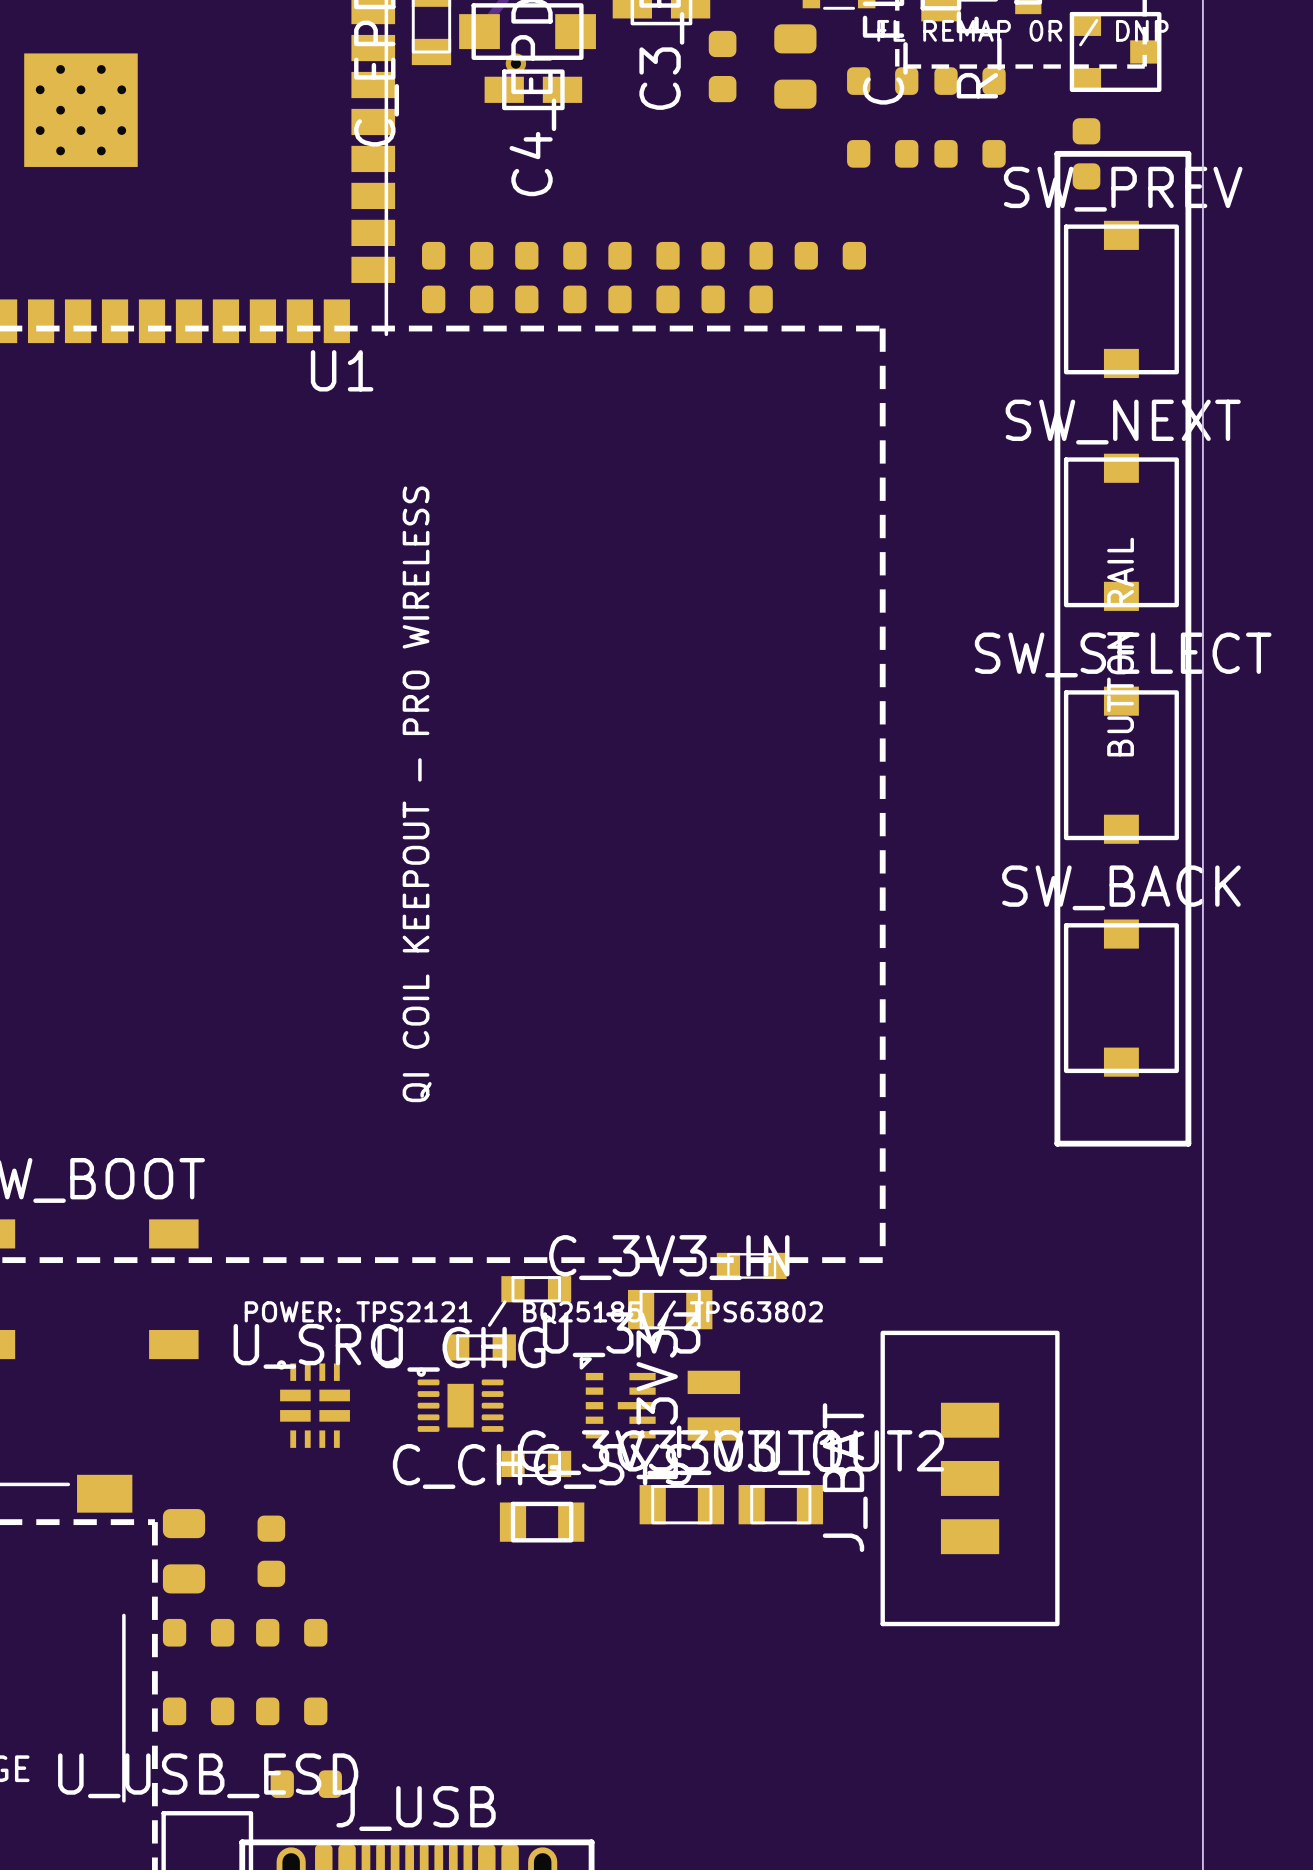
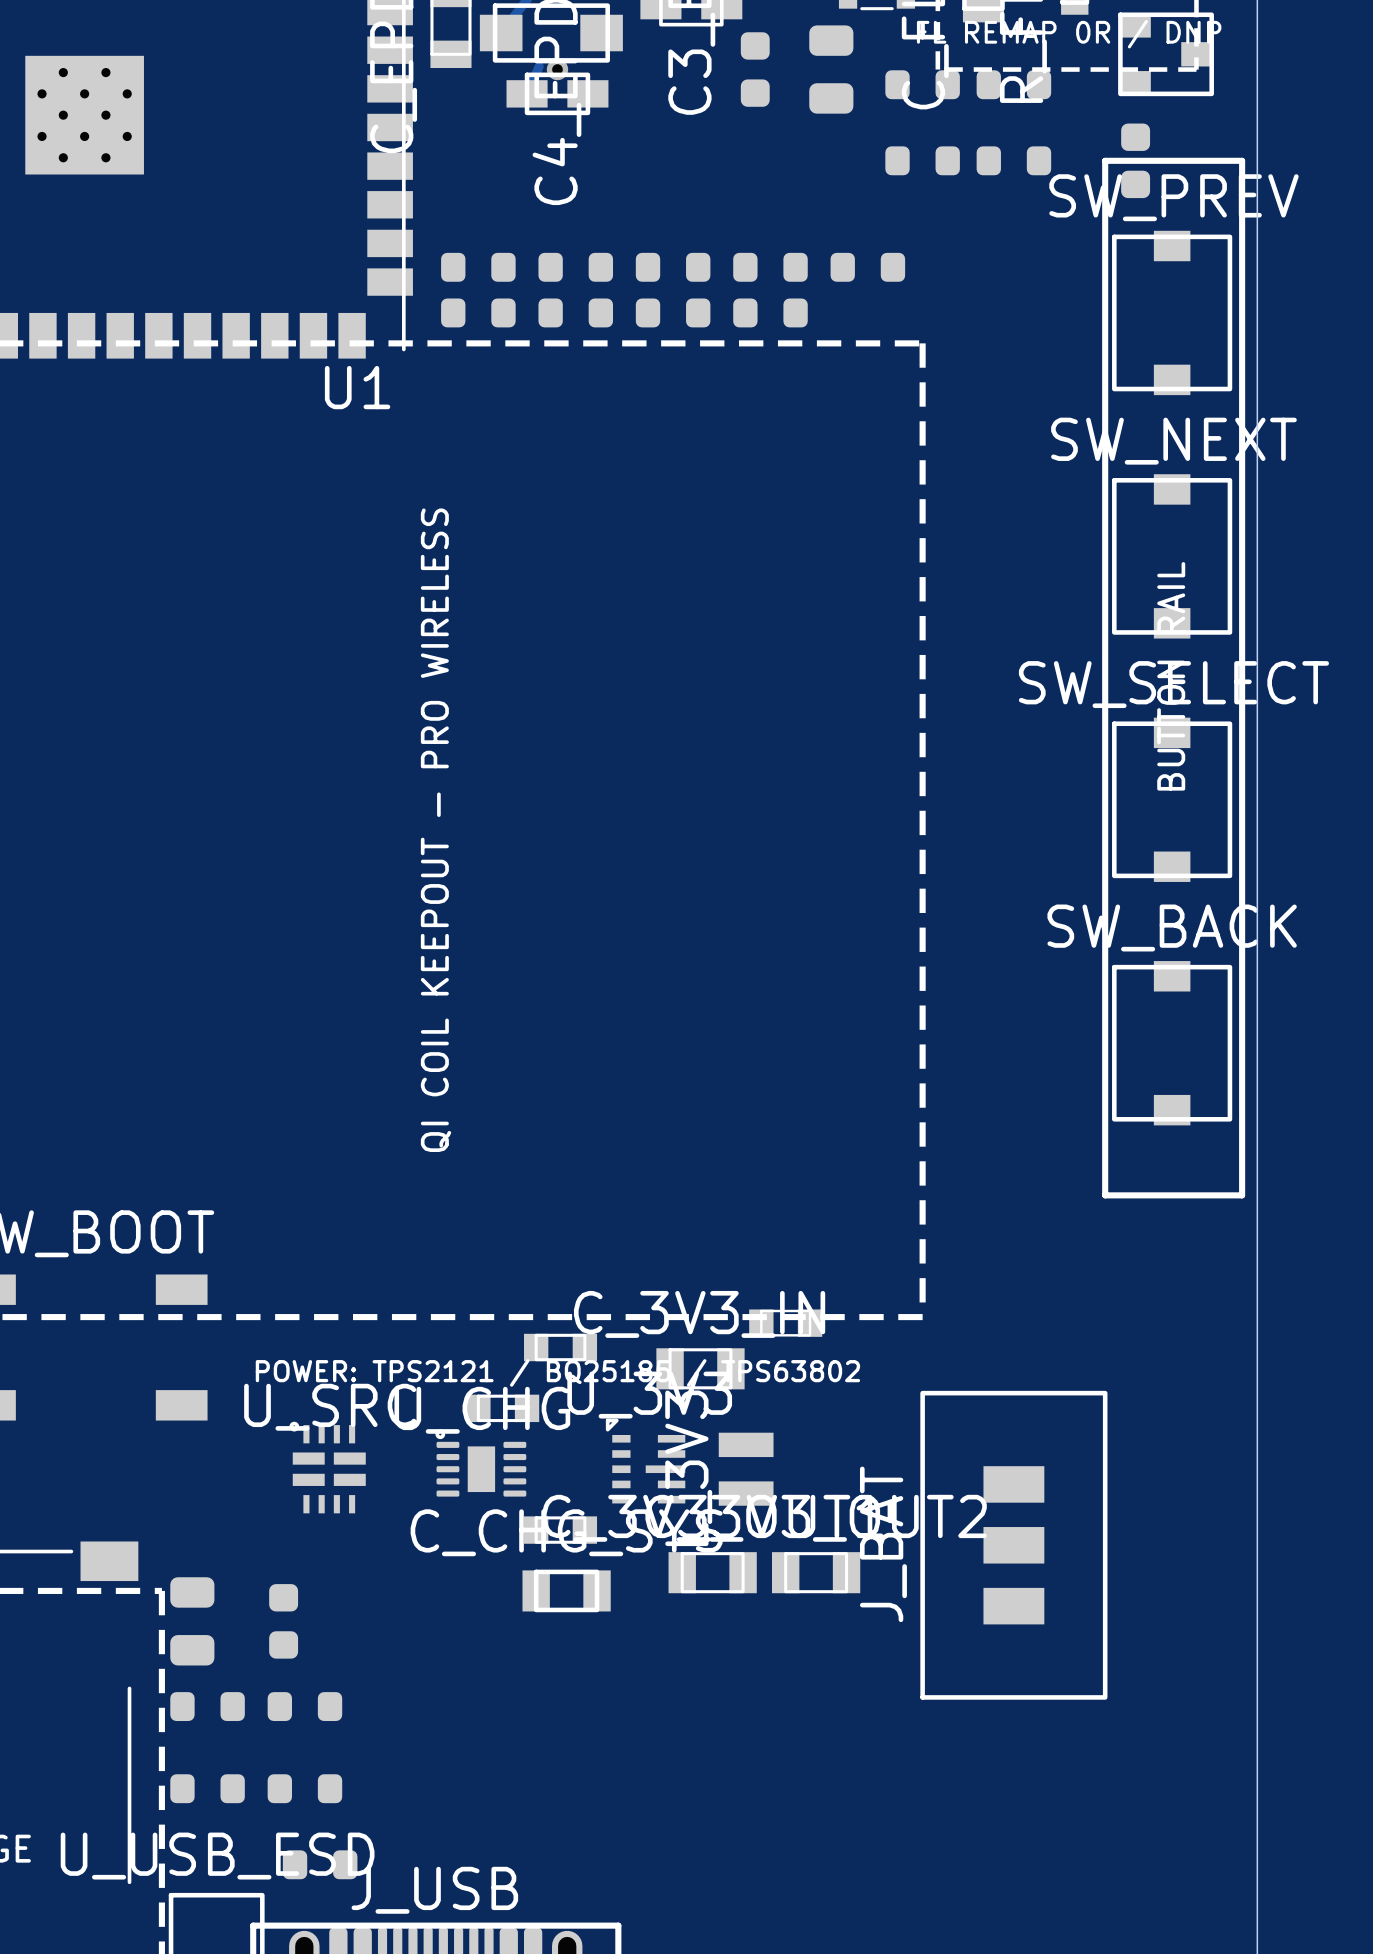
via position: (515, 63) -> (557, 69)

